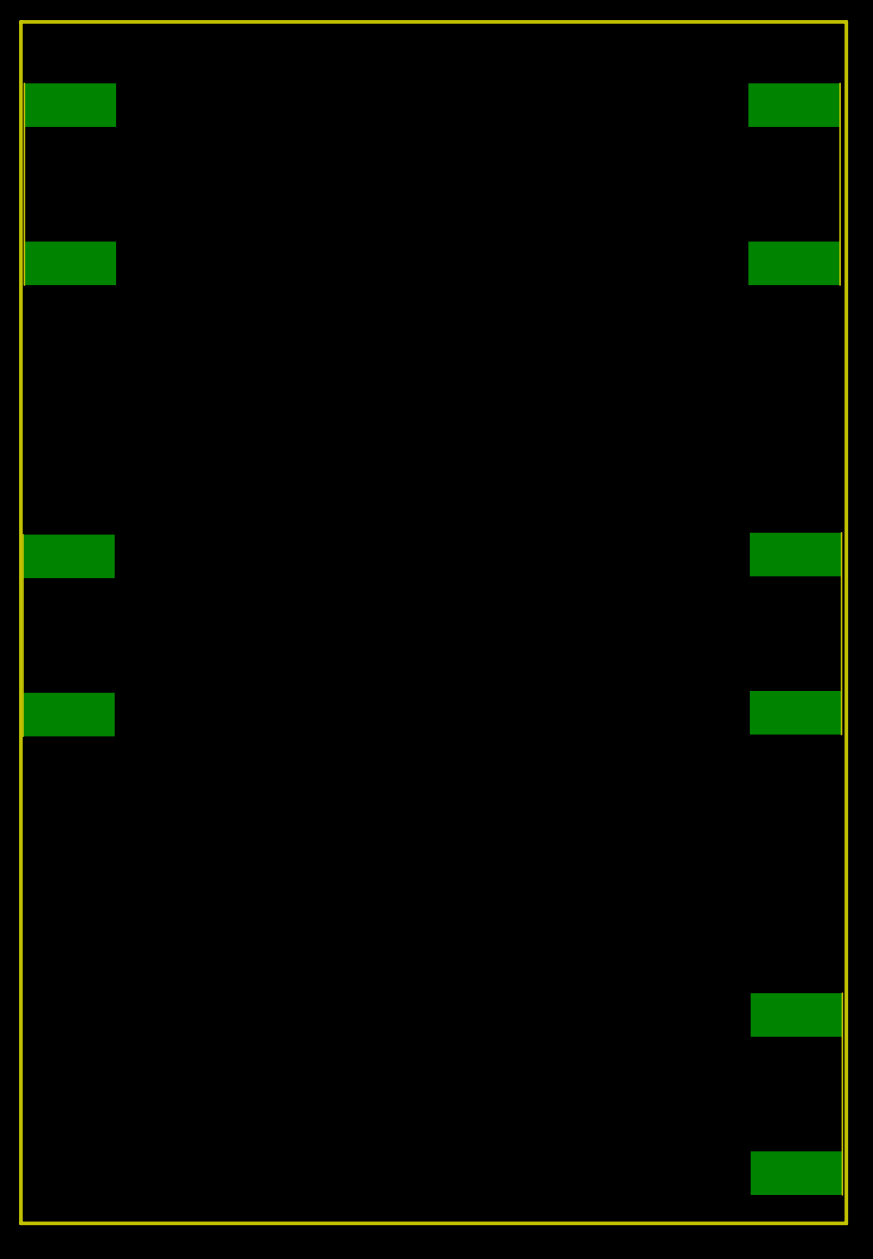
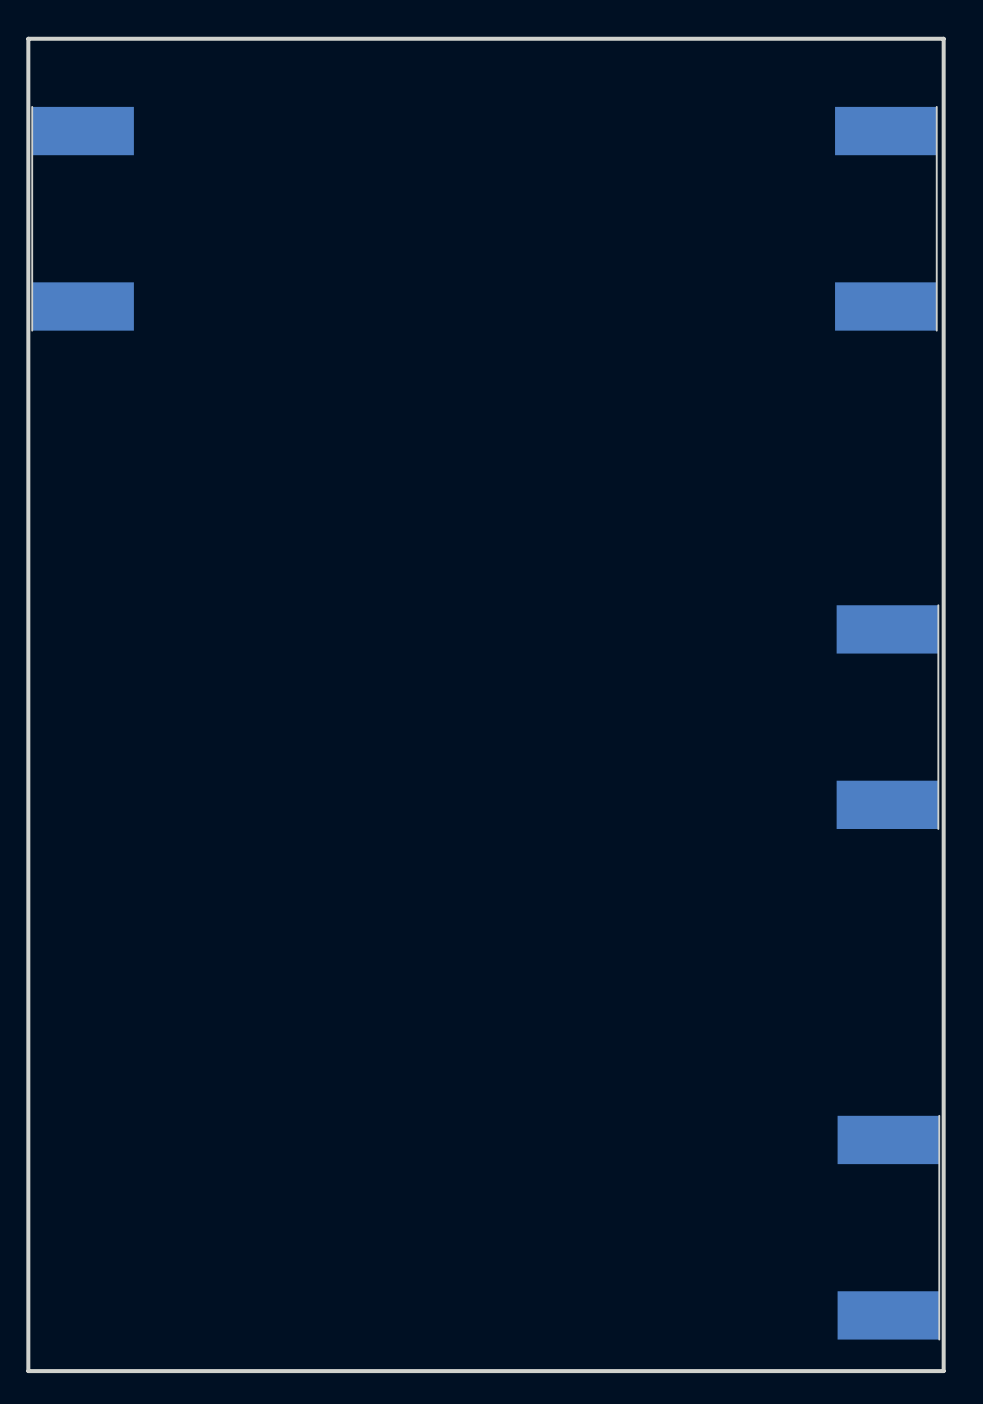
part: (68, 635) -> none

